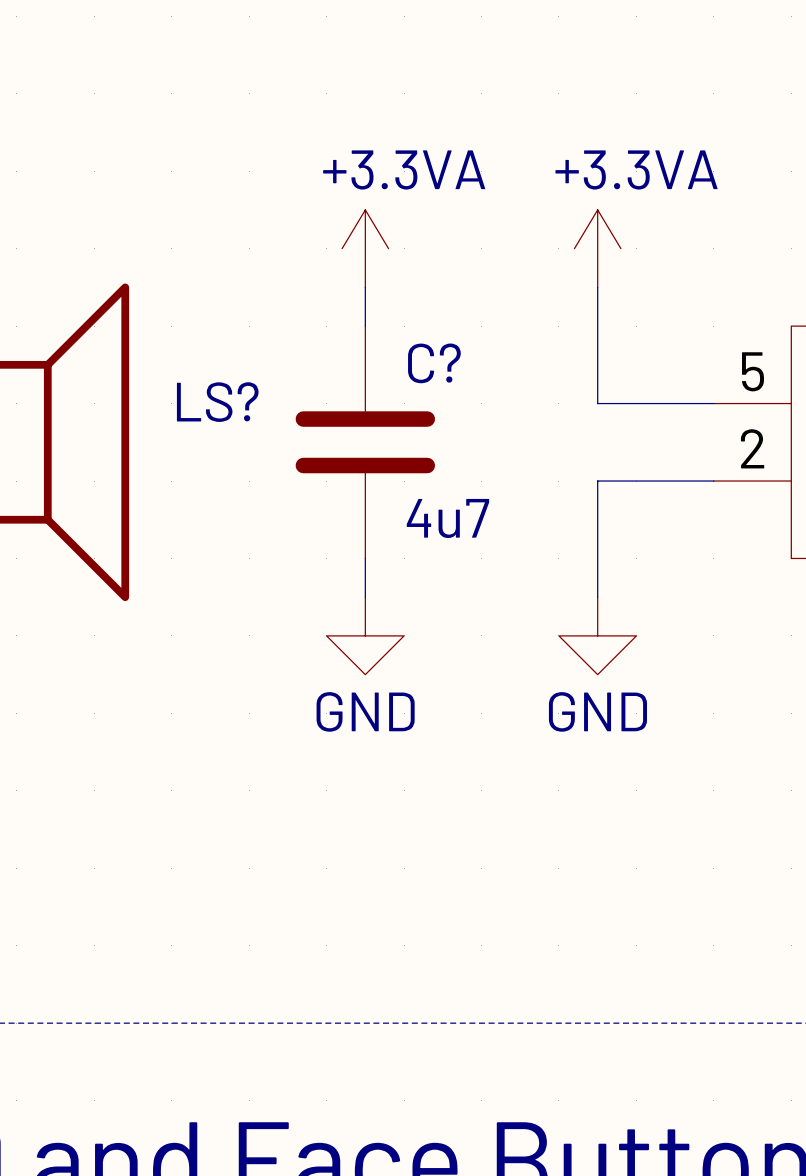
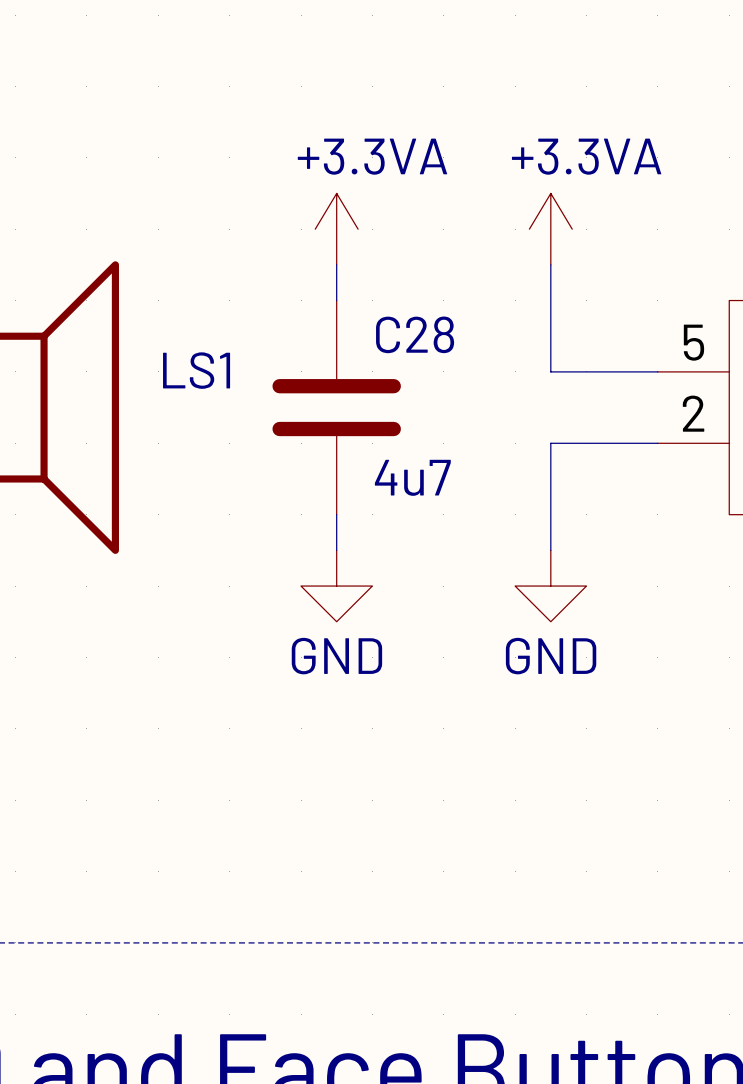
C? name: C? (434, 363) -> C28 (415, 334)
LS? name: LS? (217, 402) -> LS1 (196, 370)

